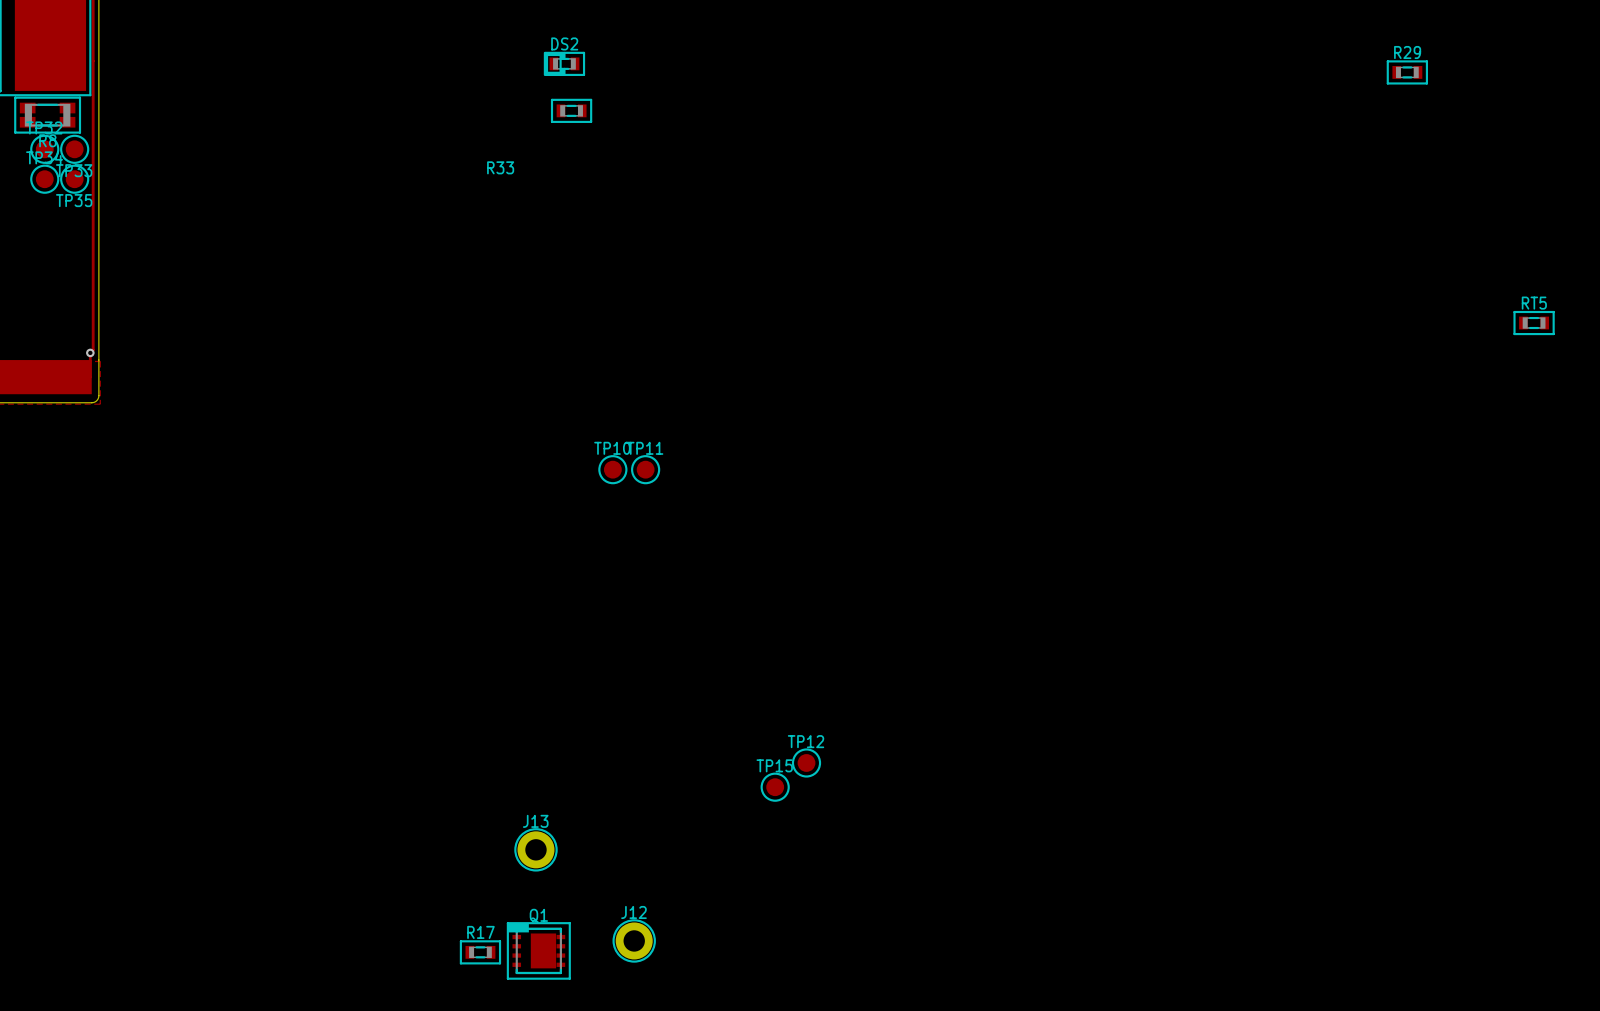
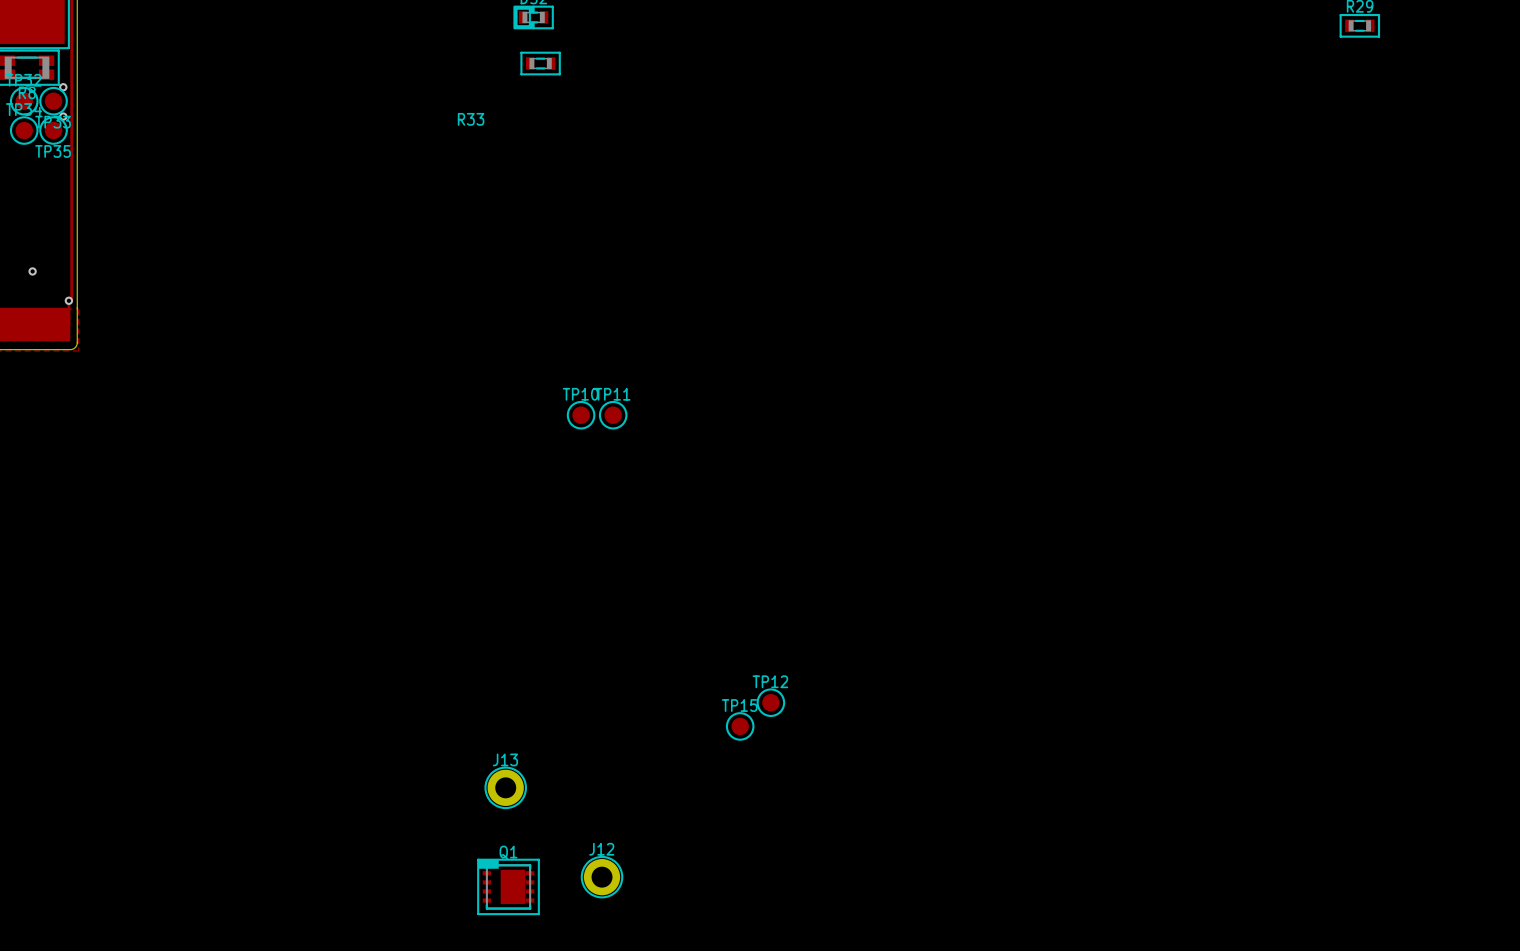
via: none -> (63, 87)
via: none -> (63, 116)
via: none -> (32, 271)
RT5: (1534, 323) -> none
R17: (480, 952) -> none

